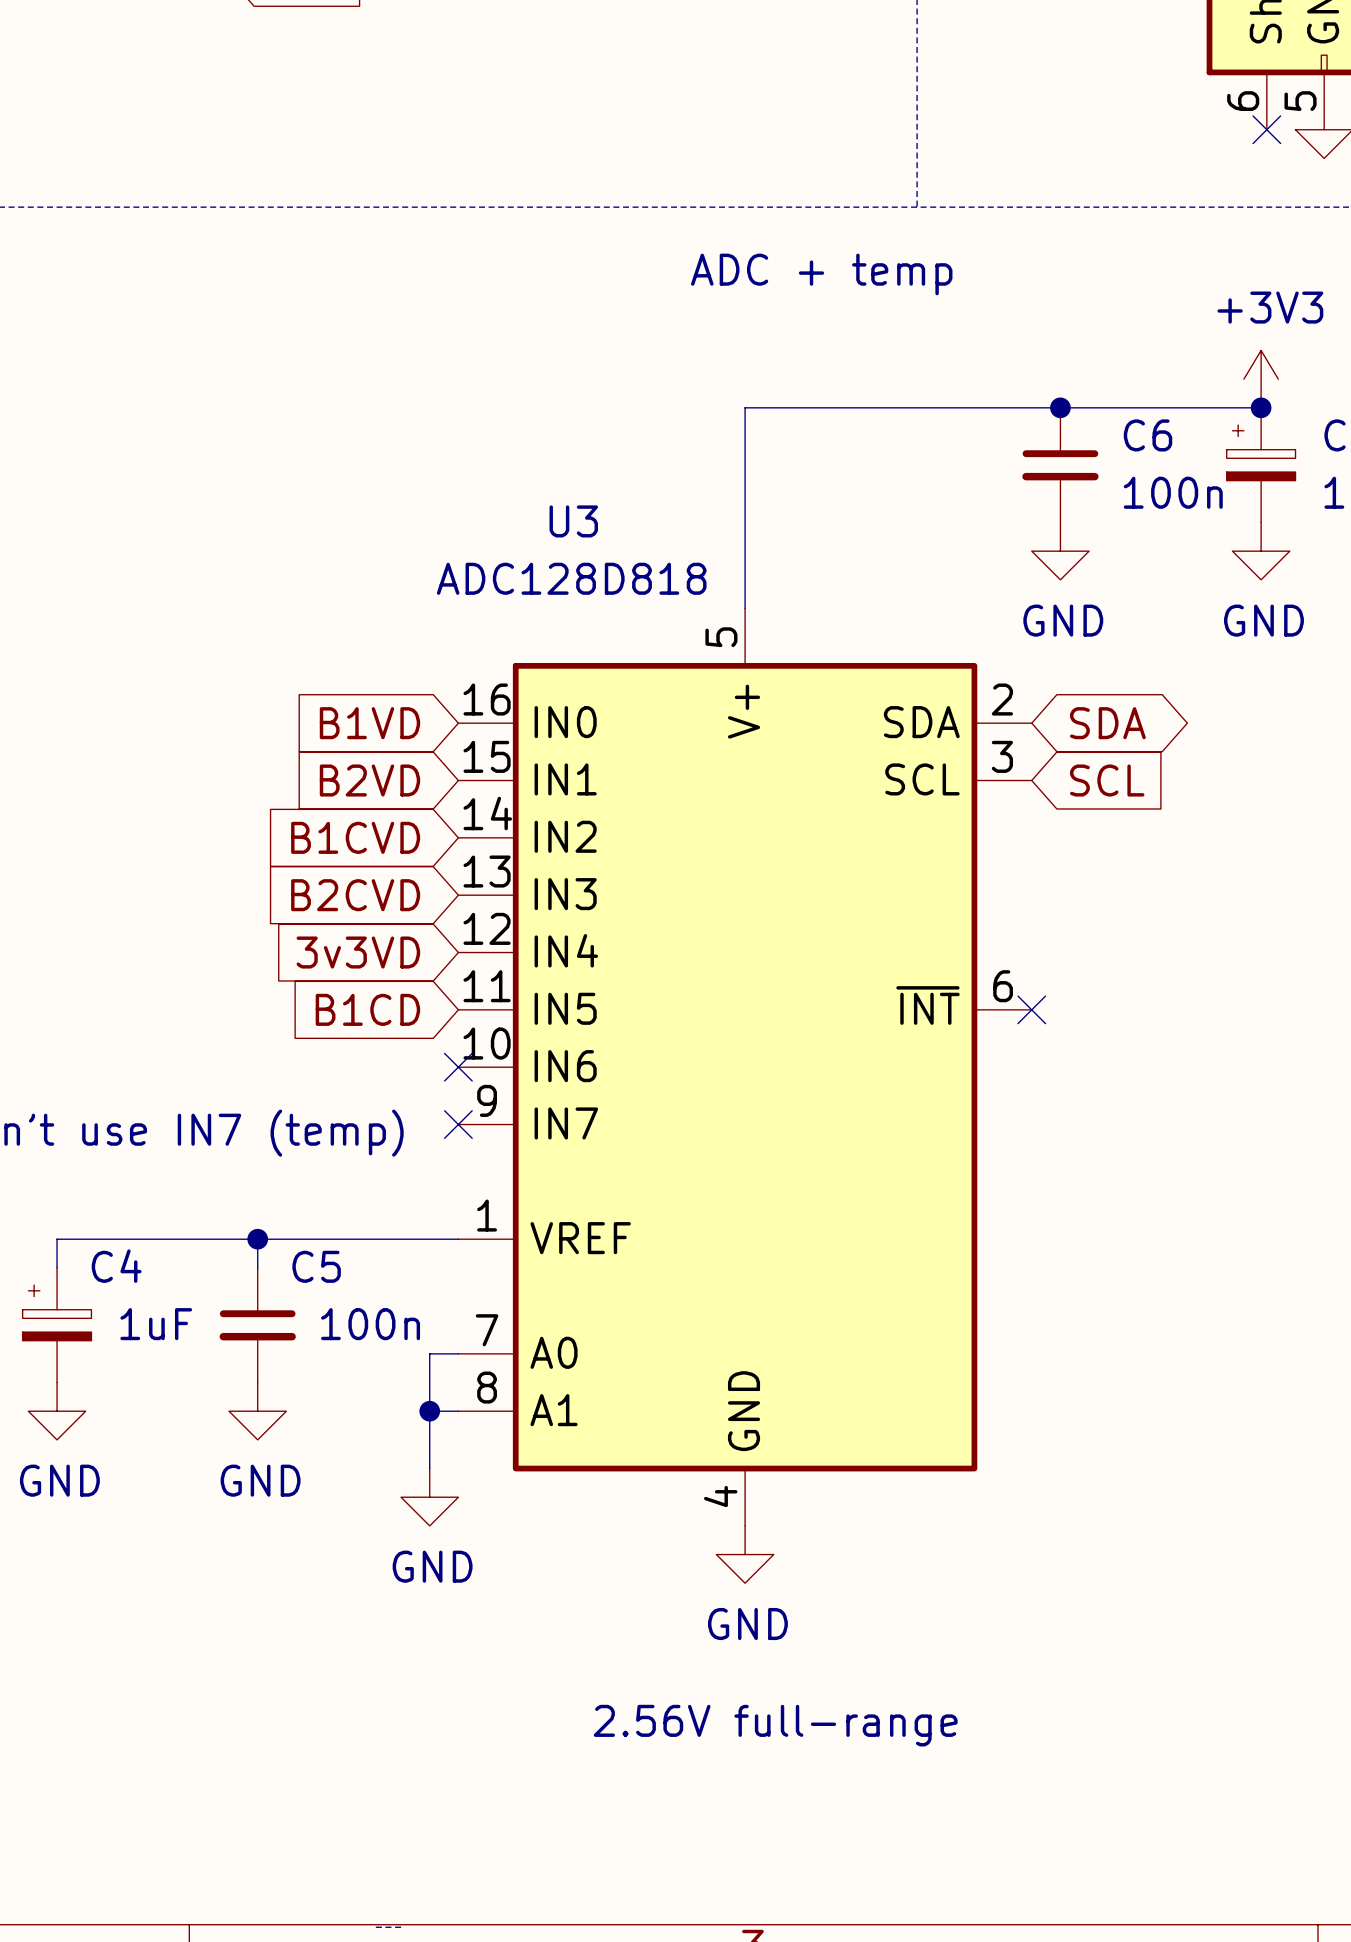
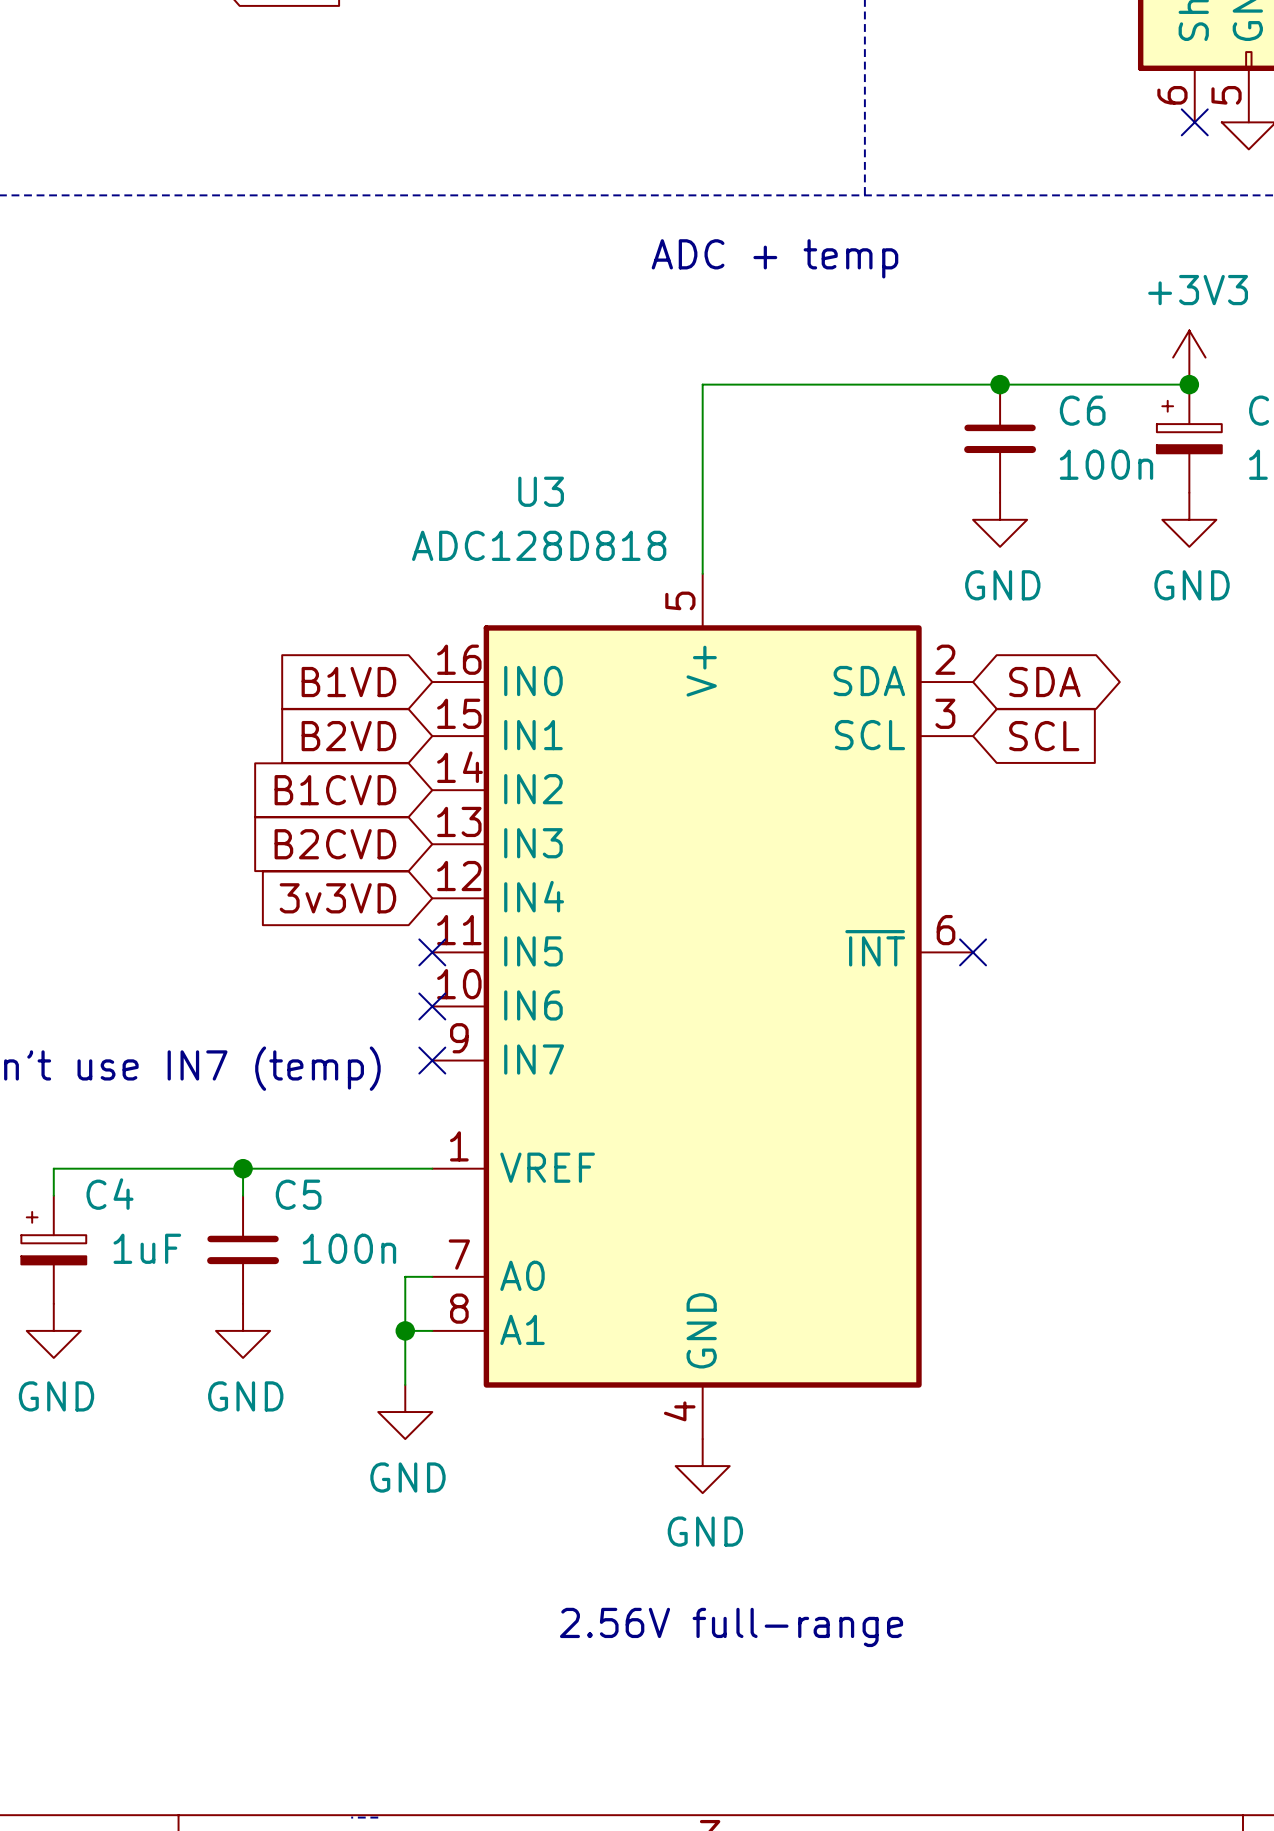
global label: B1CD (367, 1009) -> none
no-connect mark: none -> (432, 952)

